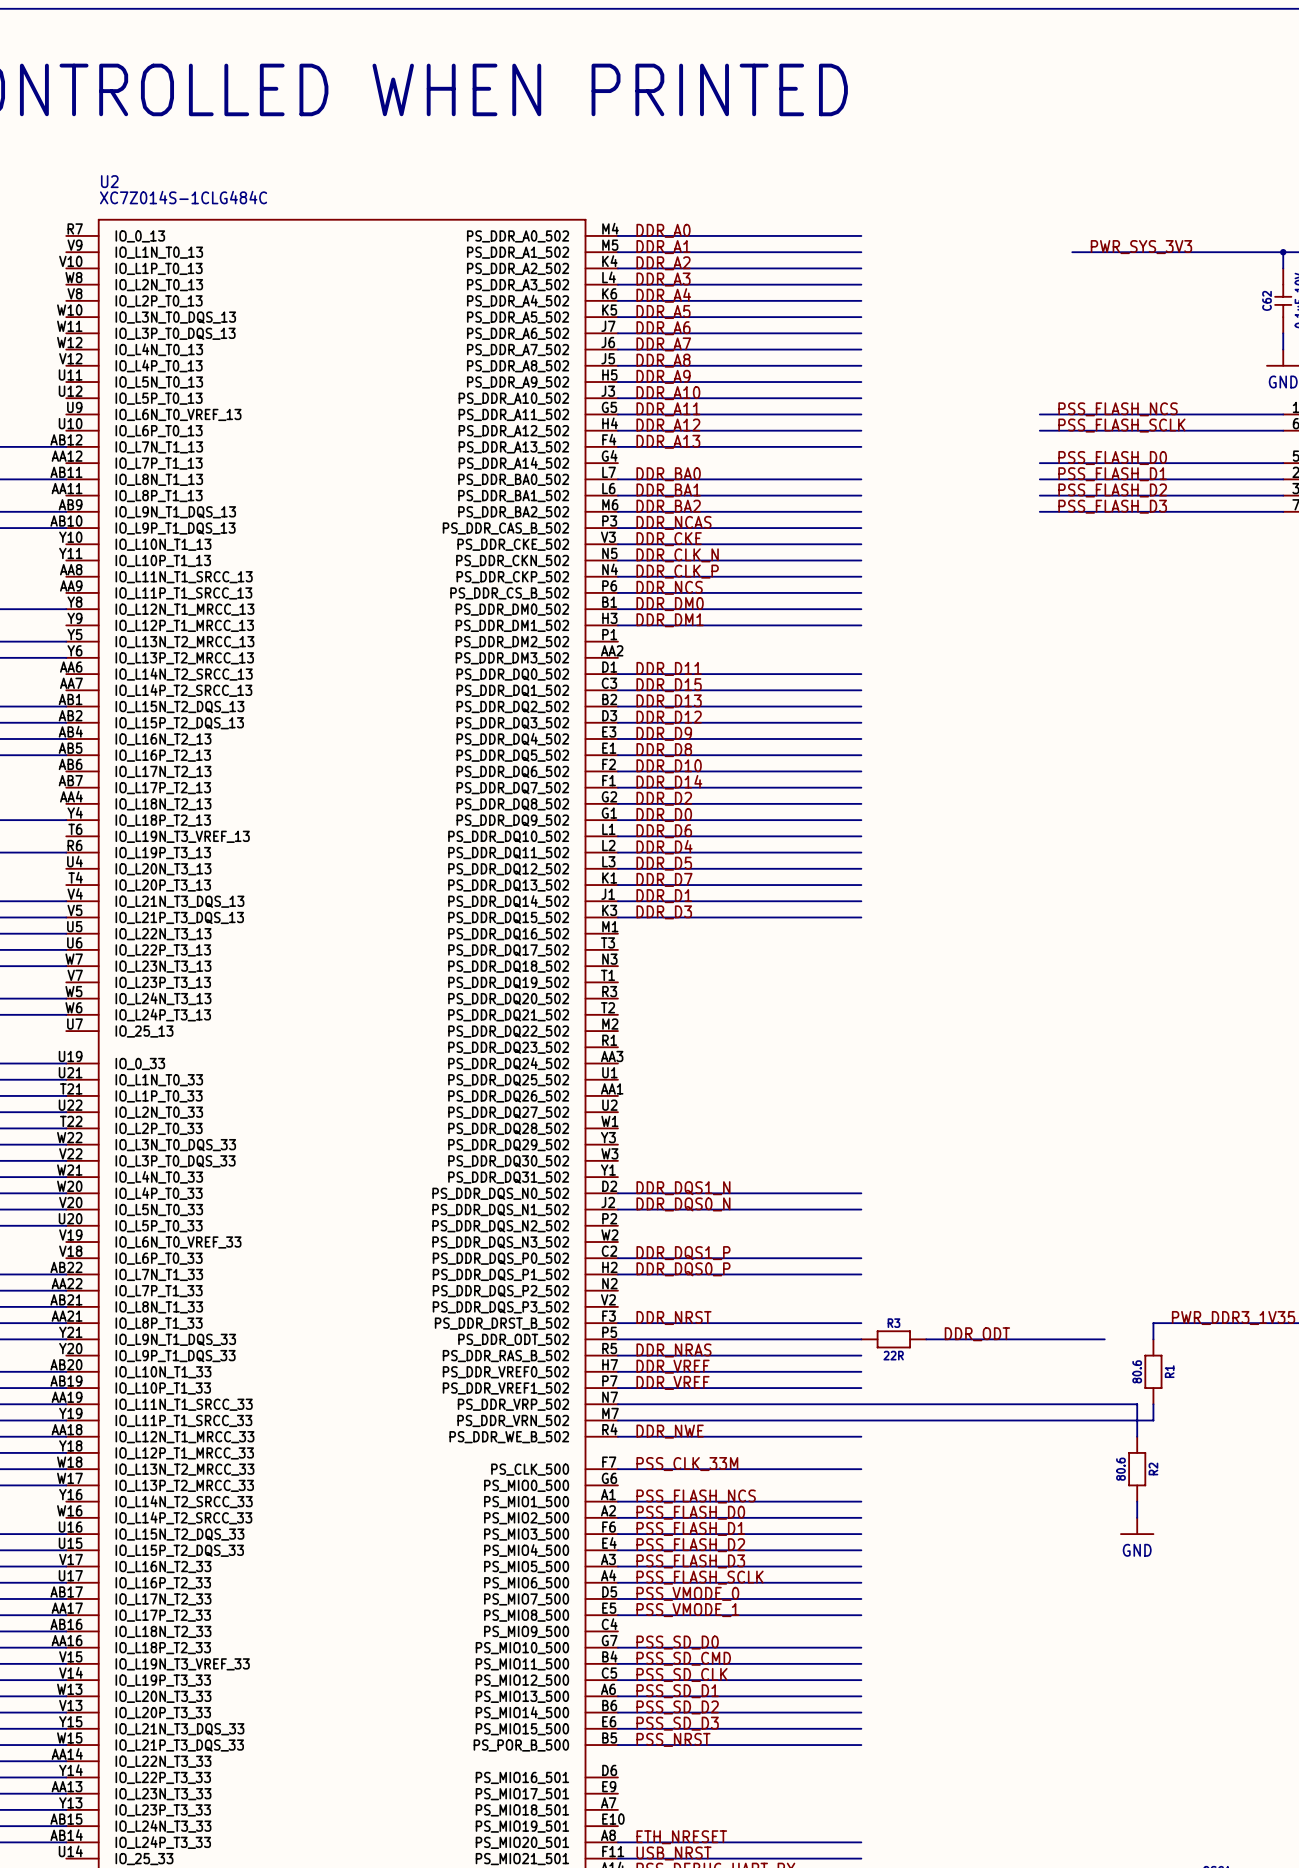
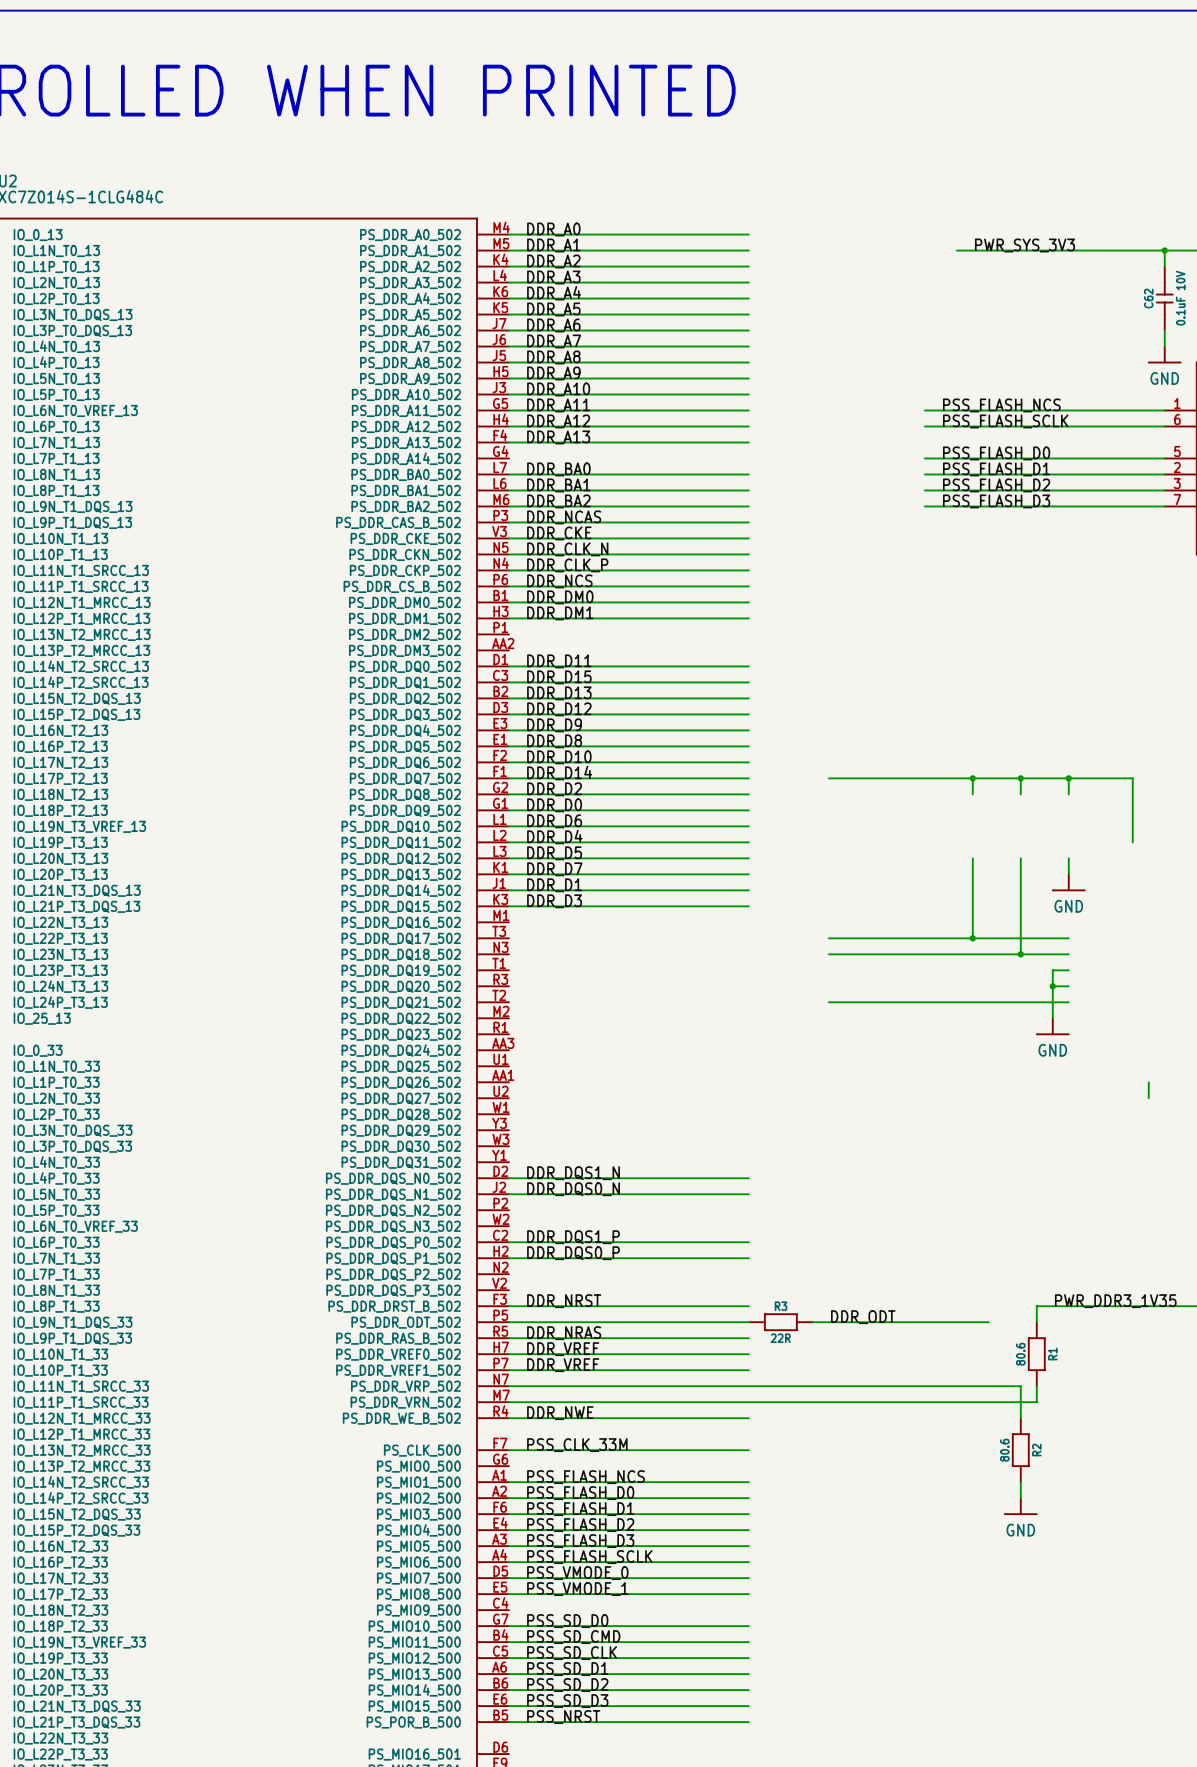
wire: none -> (828, 778) (1132, 778) (1132, 842)
wire: none -> (972, 778) (972, 794)
junction: none -> (972, 778)
wire: none -> (1020, 778) (1020, 794)
junction: none -> (1020, 778)
wire: none -> (1068, 778) (1068, 794)
junction: none -> (1068, 778)
wire: none -> (972, 858) (972, 938)
wire: none -> (1020, 858) (1020, 954)
wire: none -> (1068, 858) (1068, 874)
power symbol: none -> GND (1068, 882)
wire: none -> (828, 938) (1068, 938)
junction: none -> (972, 938)
wire: none -> (828, 954) (1068, 954)
junction: none -> (1020, 954)
wire: none -> (1068, 970) (1052, 970) (1052, 1018)
wire: none -> (1052, 986) (1068, 986)
junction: none -> (1052, 986)
wire: none -> (828, 1002) (1068, 1002)
power symbol: none -> GND (1052, 1026)
wire: none -> (1148, 1082) (1148, 1098)

